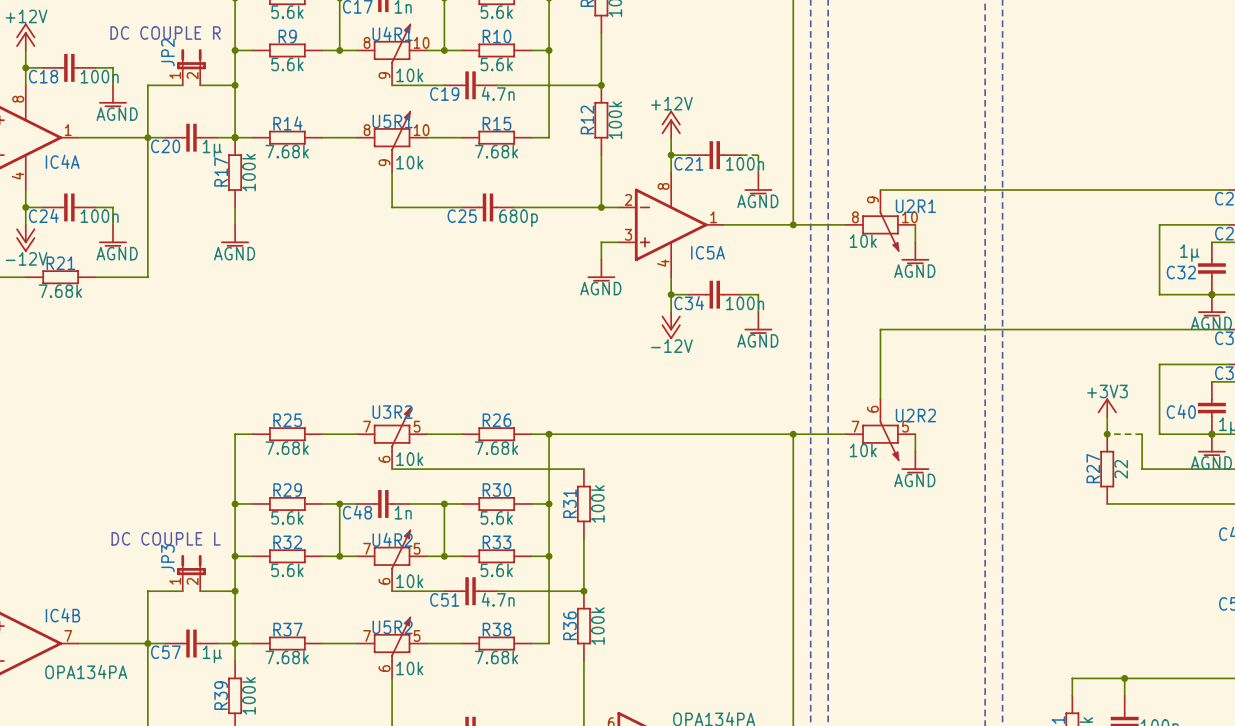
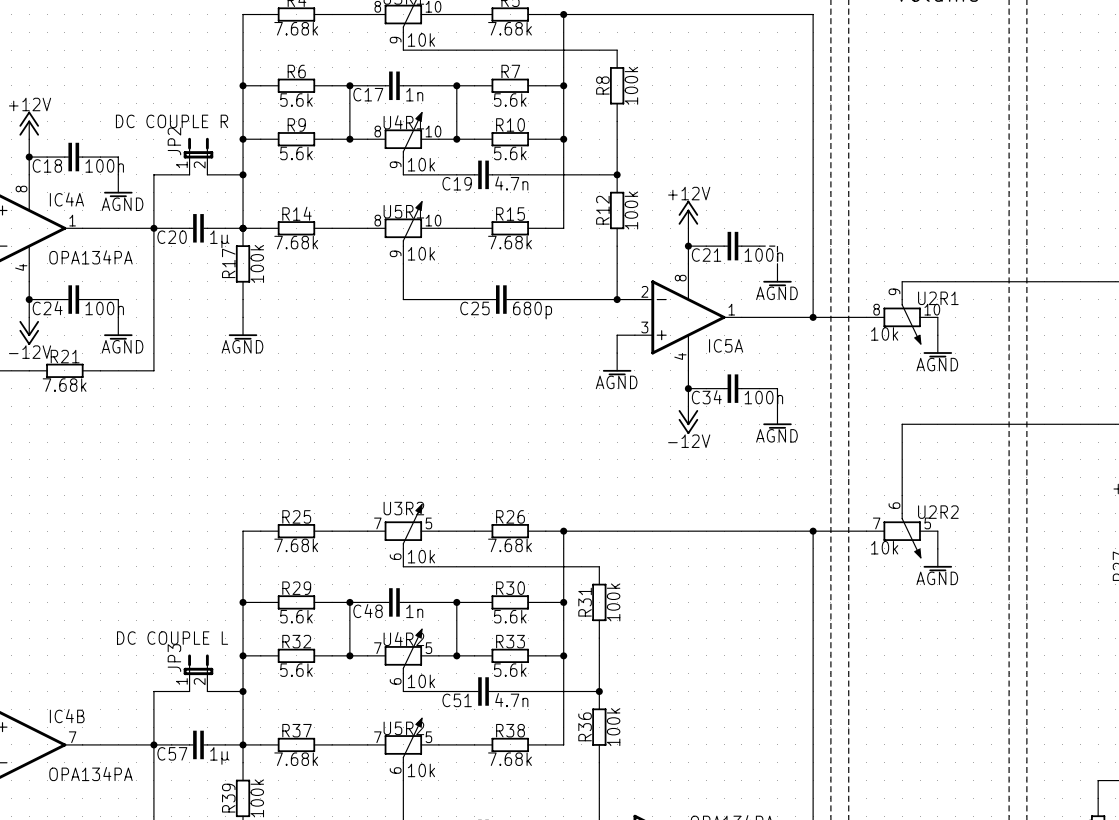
IC4A name position: IC4A (62, 161) -> IC4A (66, 199)
IC4A value: none -> OPA134PA (90, 257)

